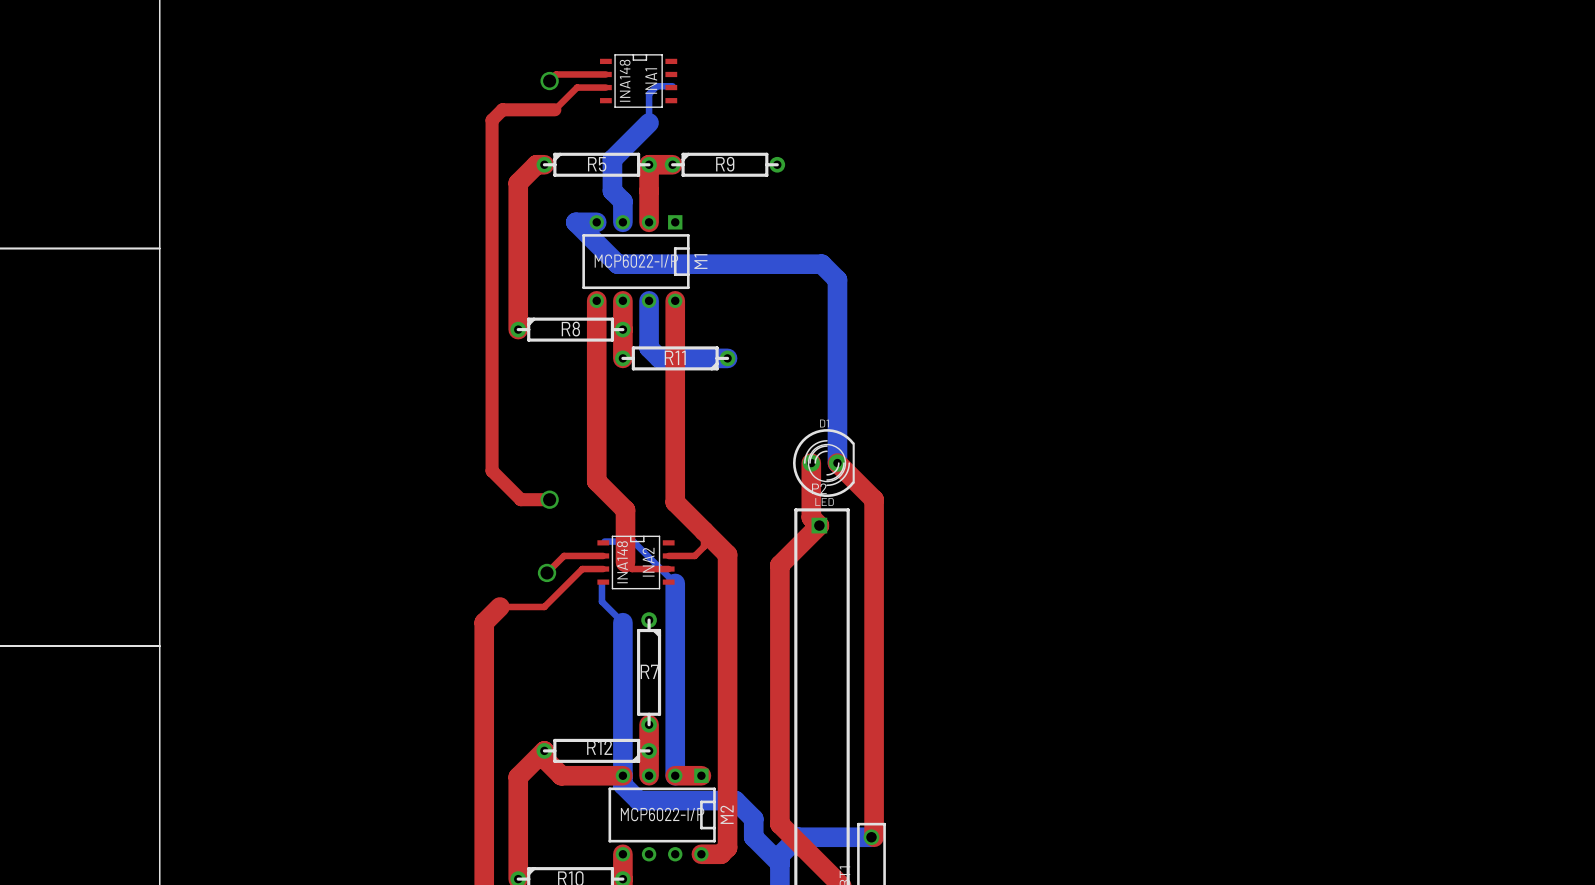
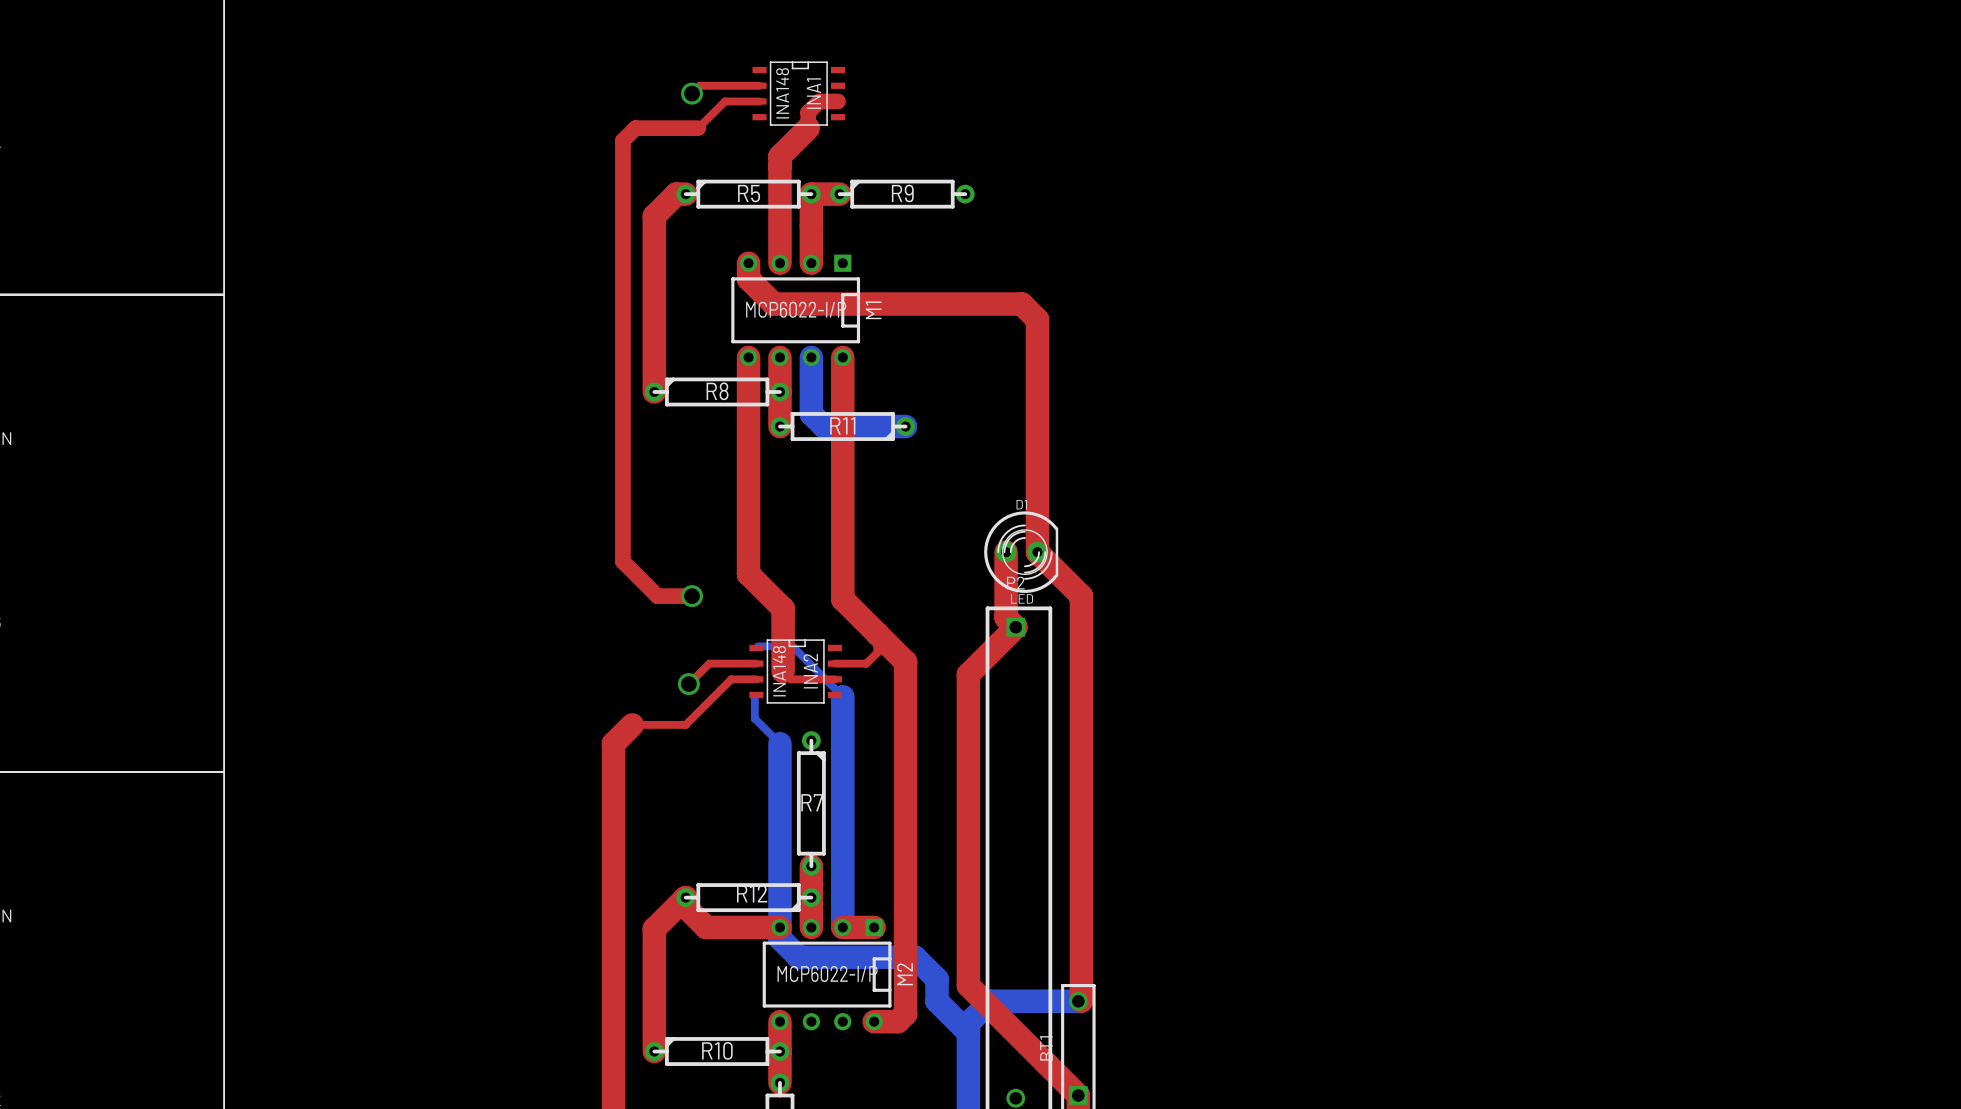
bottom track: (672, 86) (656, 86) (649, 94) (649, 122) (612, 159) (612, 190) (622, 201) (622, 222) -> none
top track: none -> (838, 101) (819, 101) (808, 112) (808, 128) (779, 156) (779, 263)
top track: none -> (748, 263) (748, 278) (773, 304) (1021, 304) (1037, 319) (1037, 552)
bottom track: (596, 222) (575, 222) (617, 264) (821, 264) (837, 279) (837, 463) -> none

